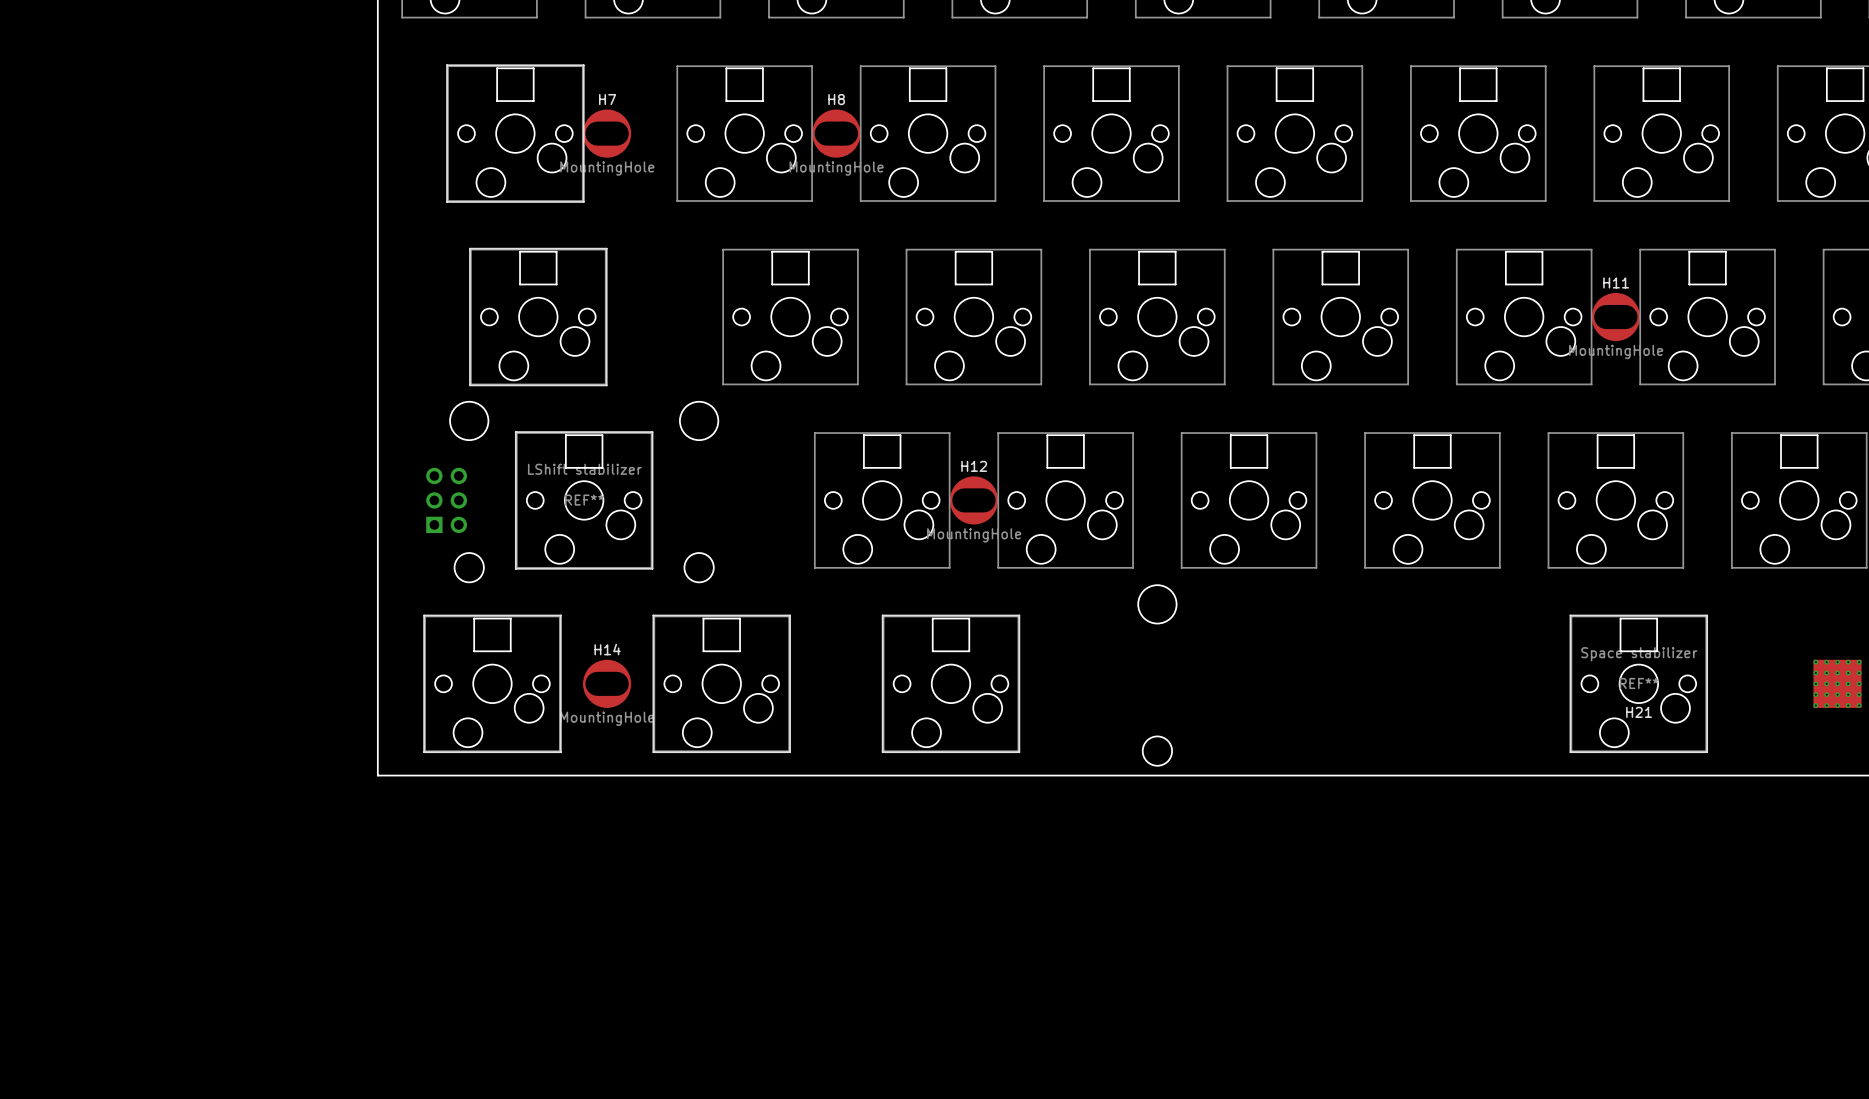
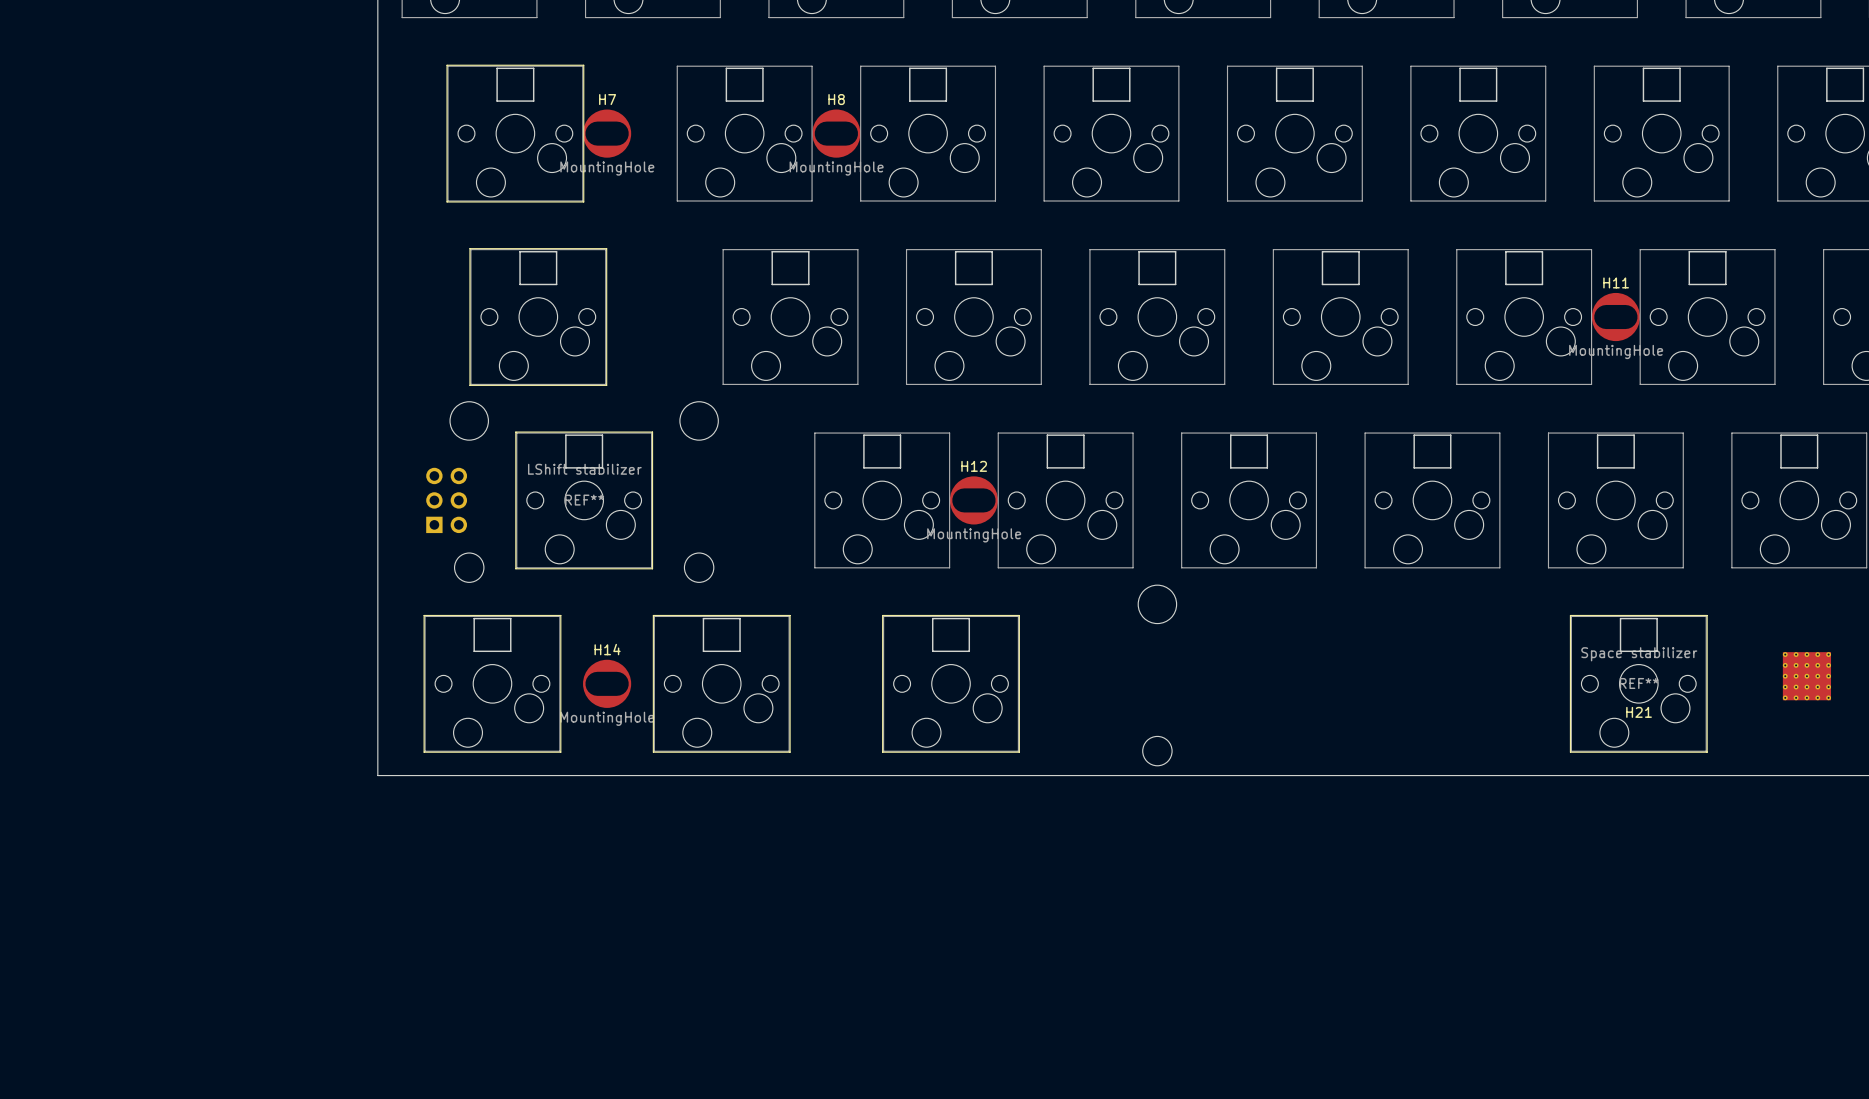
part position: (1837, 683) -> (1806, 676)

